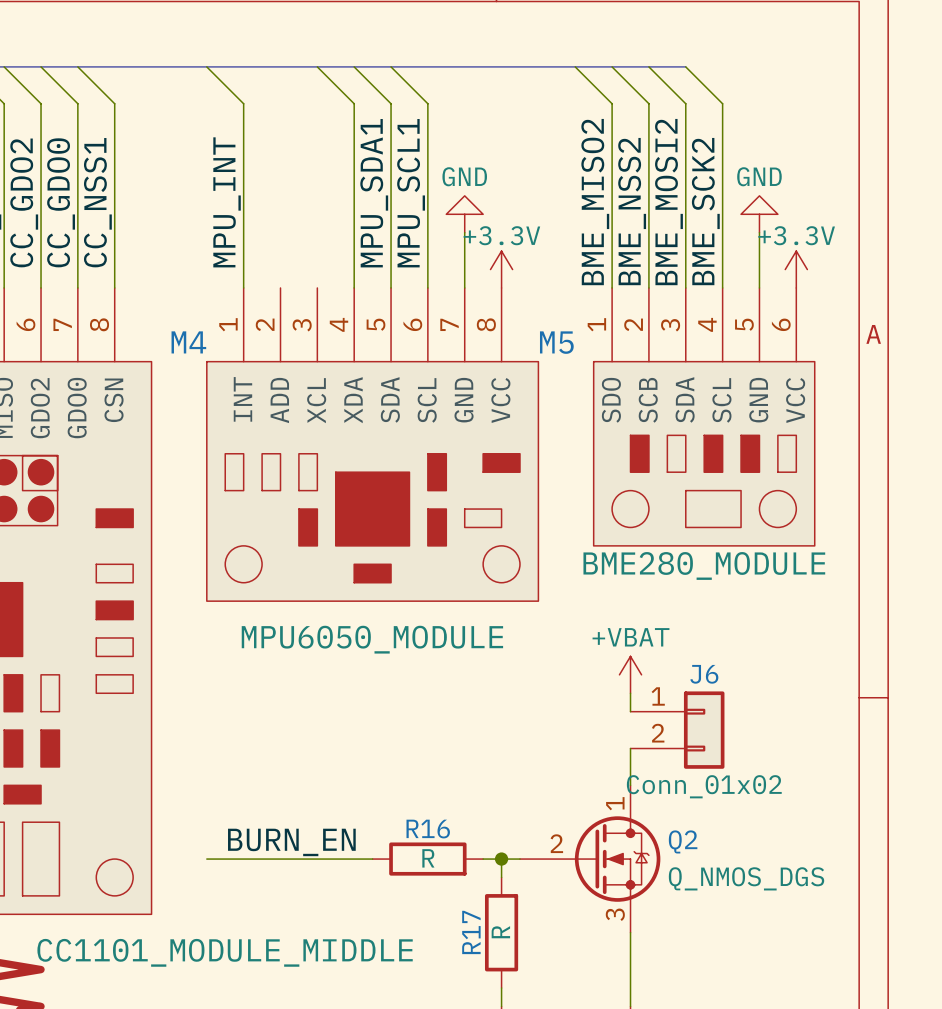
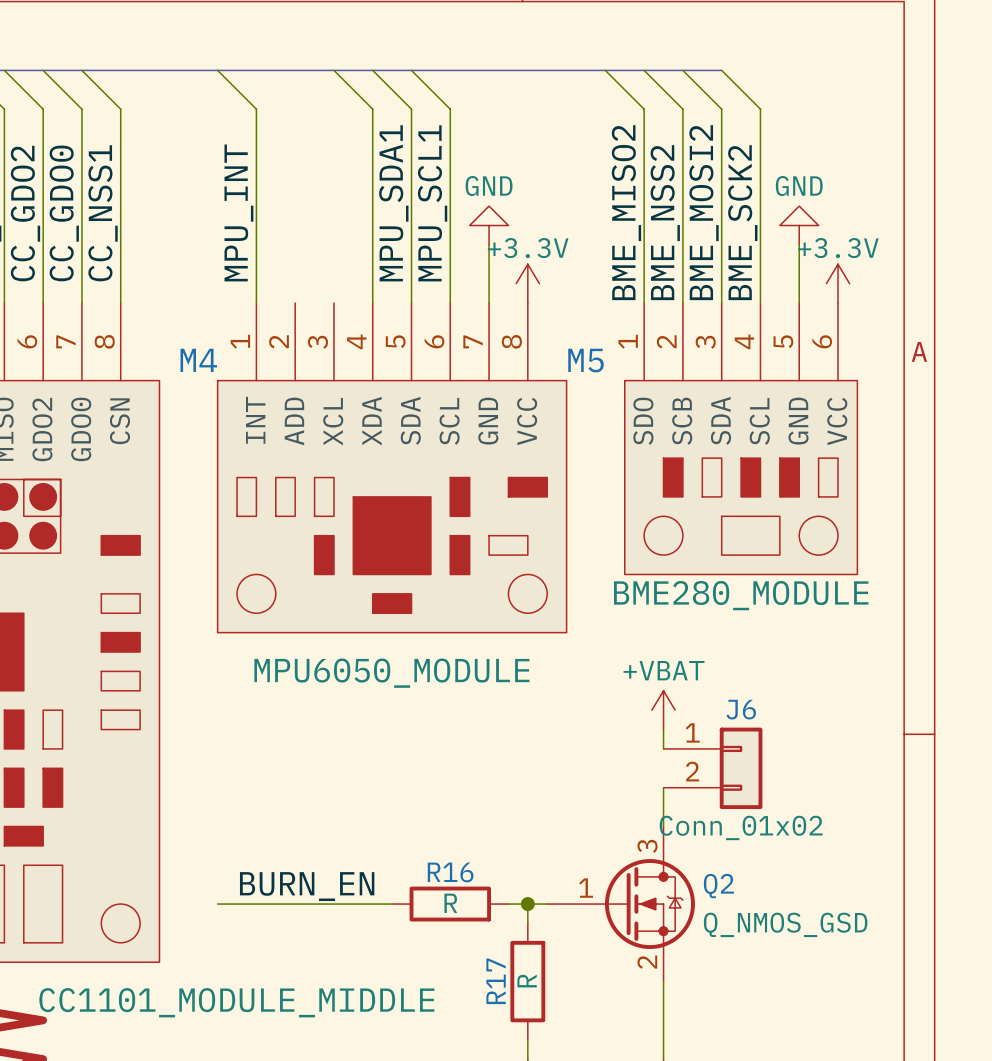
Q2 pin number: 1 (615, 803) -> 3 (647, 846)
Q2 pin number: 2 (556, 843) -> 1 (586, 888)
Q2 value: Q_NMOS_DGS (746, 878) -> Q_NMOS_GSD (785, 924)
Q2 pin number: 3 (615, 914) -> 2 (647, 962)

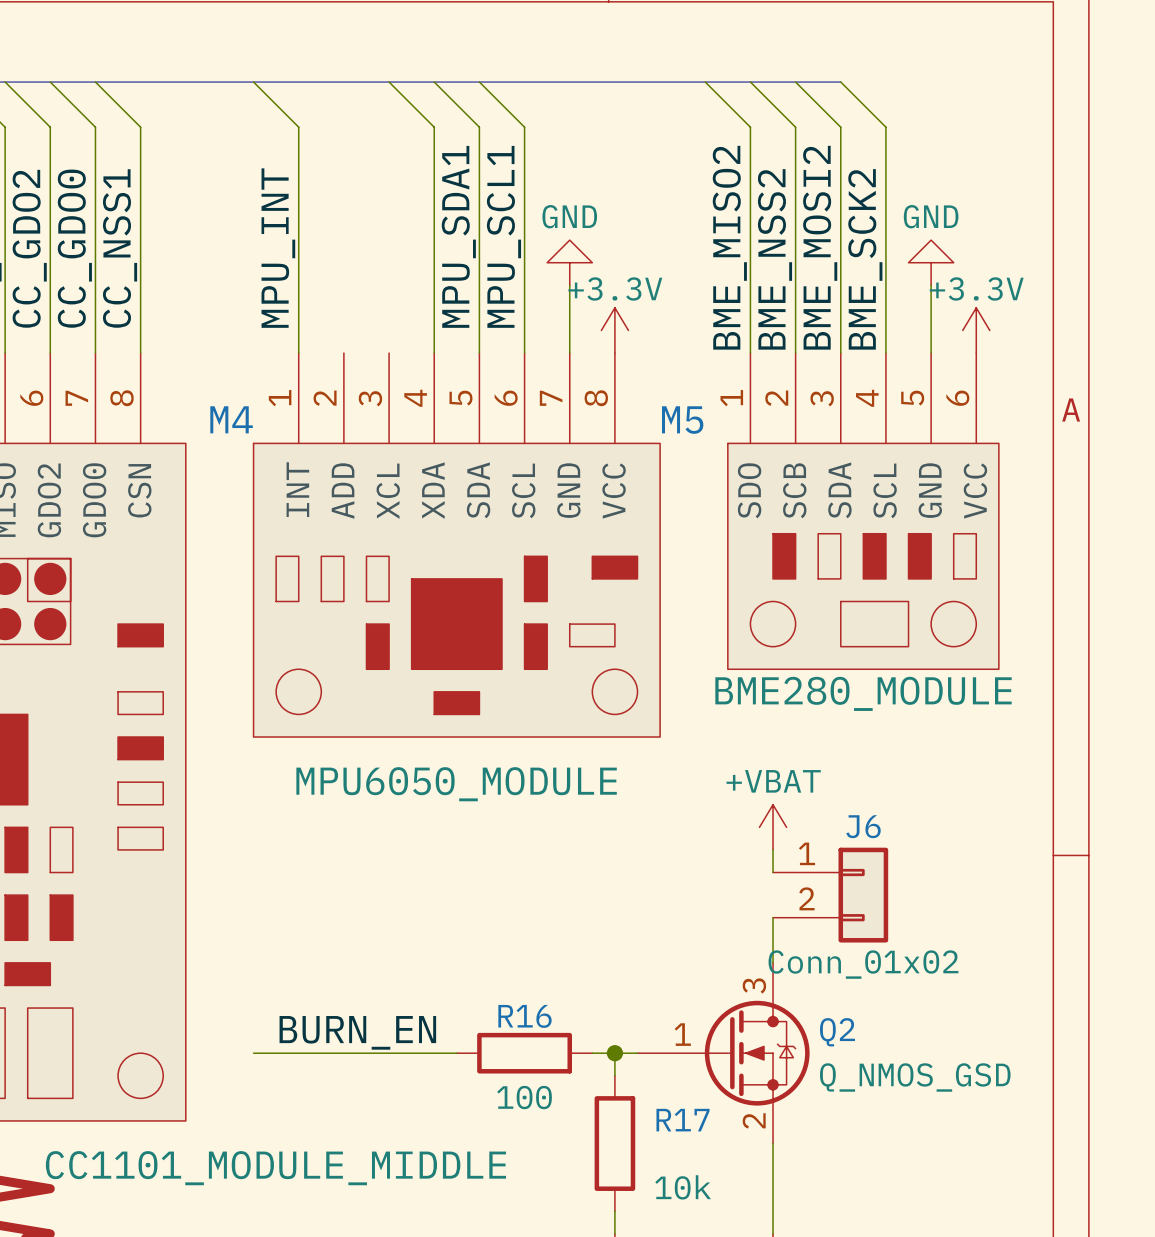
R16 value: R (450, 903) -> 100 (524, 1097)
R17 name rotation: 0° (496, 981) -> 90° clockwise (683, 1120)
R17 name position: R17 (496, 981) -> R17 (683, 1120)
R17 value: R (527, 981) -> 10k (683, 1187)

